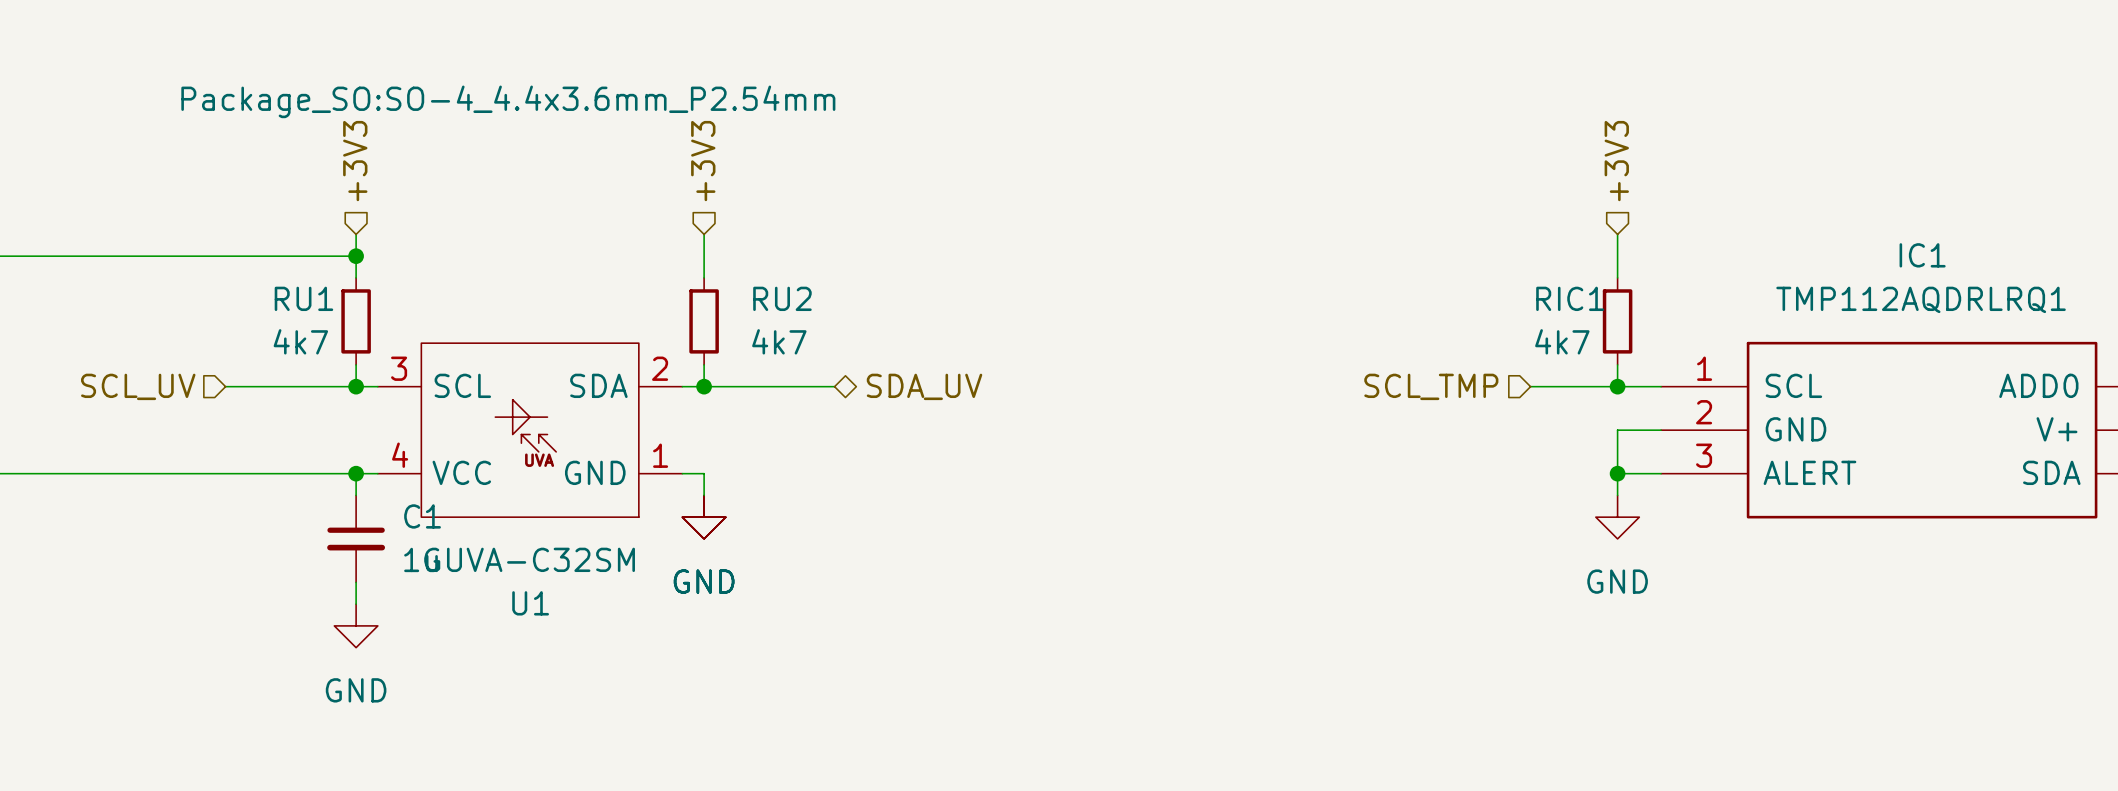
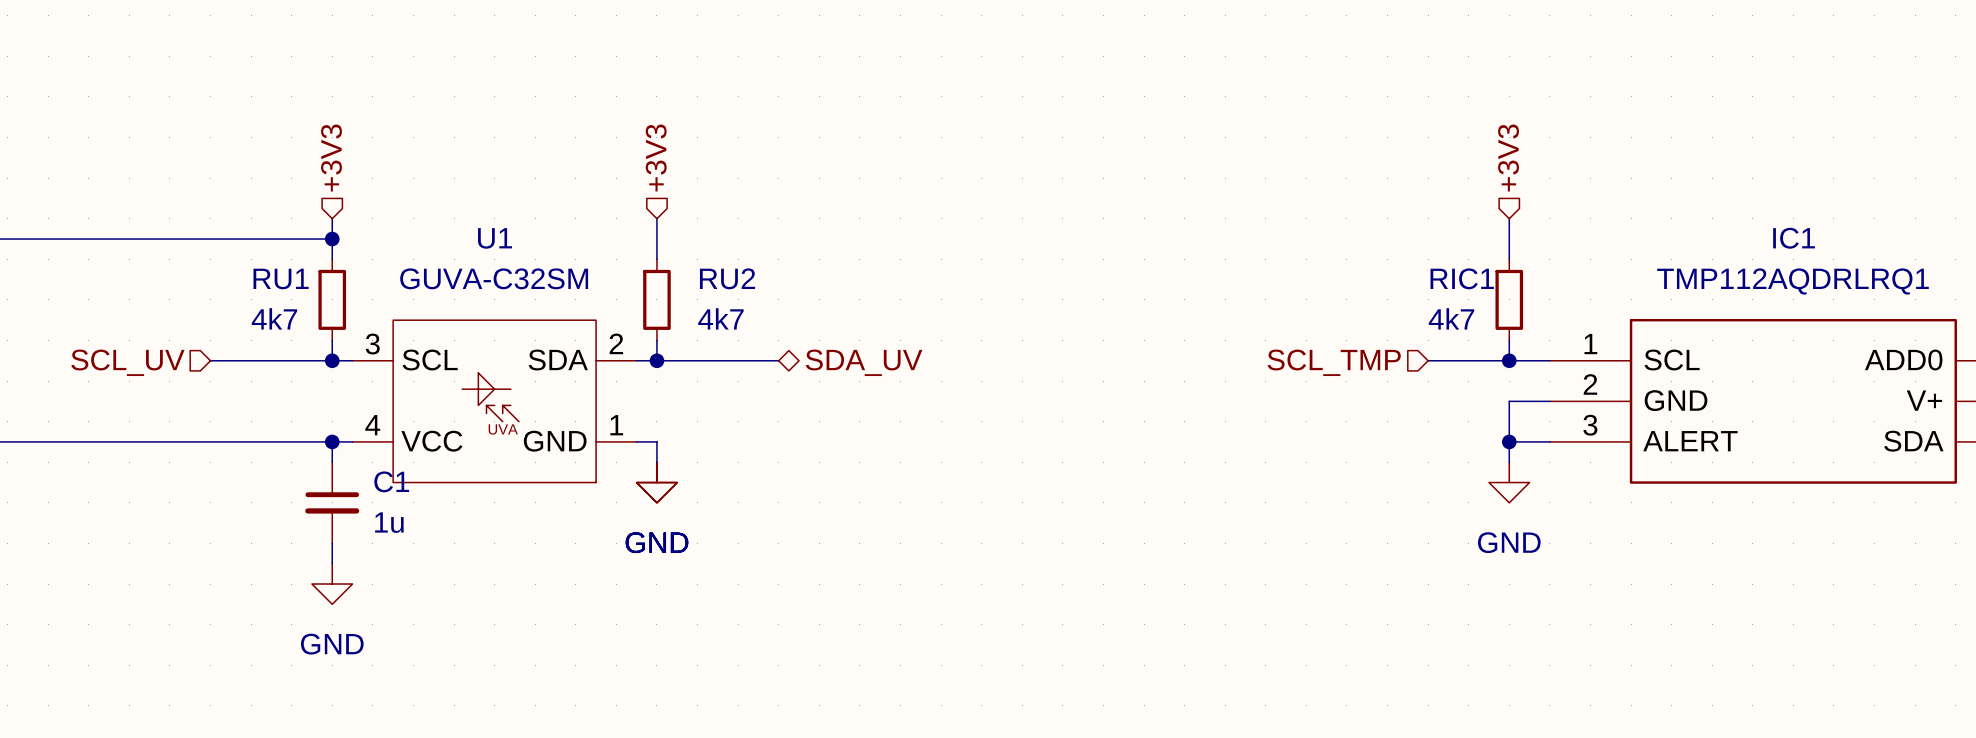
U1 text: Package_SO:SO-4_4.4x3.6mm_P2.54mm (508, 101) -> none
U1 value position: GUVA-C32SM (529, 559) -> GUVA-C32SM (494, 278)
U1 name position: U1 (530, 603) -> U1 (495, 238)

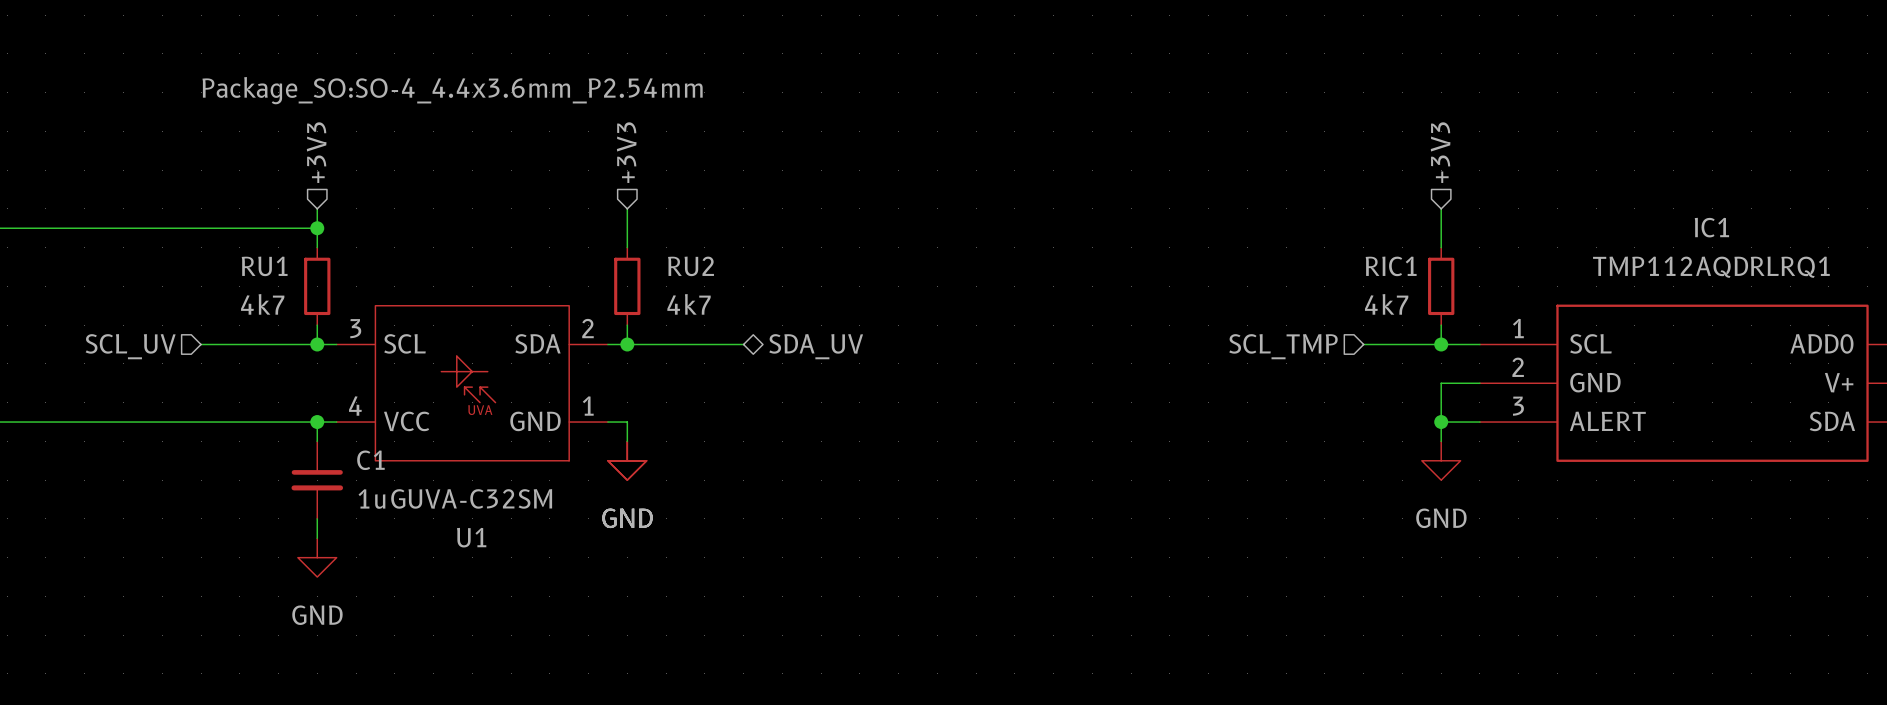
U1 text: none -> Package_SO:SO-4_4.4x3.6mm_P2.54mm (452, 90)
U1 name position: U1 (495, 238) -> U1 (471, 537)
U1 value position: GUVA-C32SM (494, 278) -> GUVA-C32SM (471, 498)

